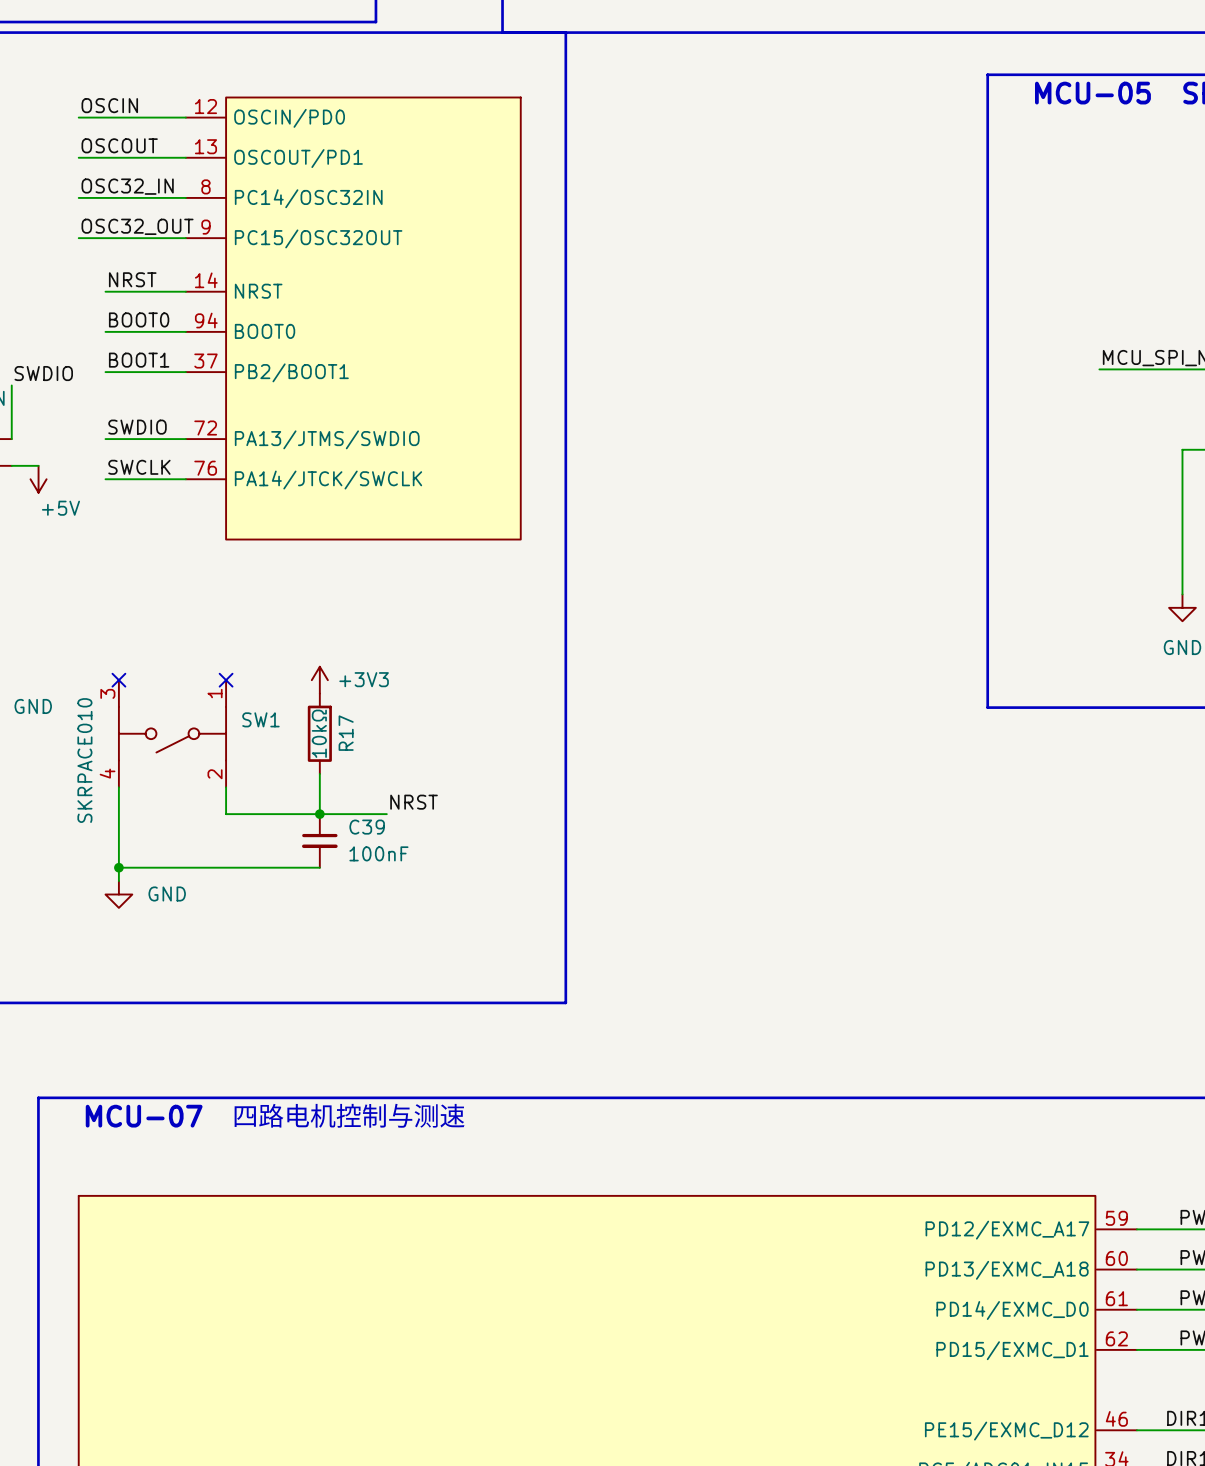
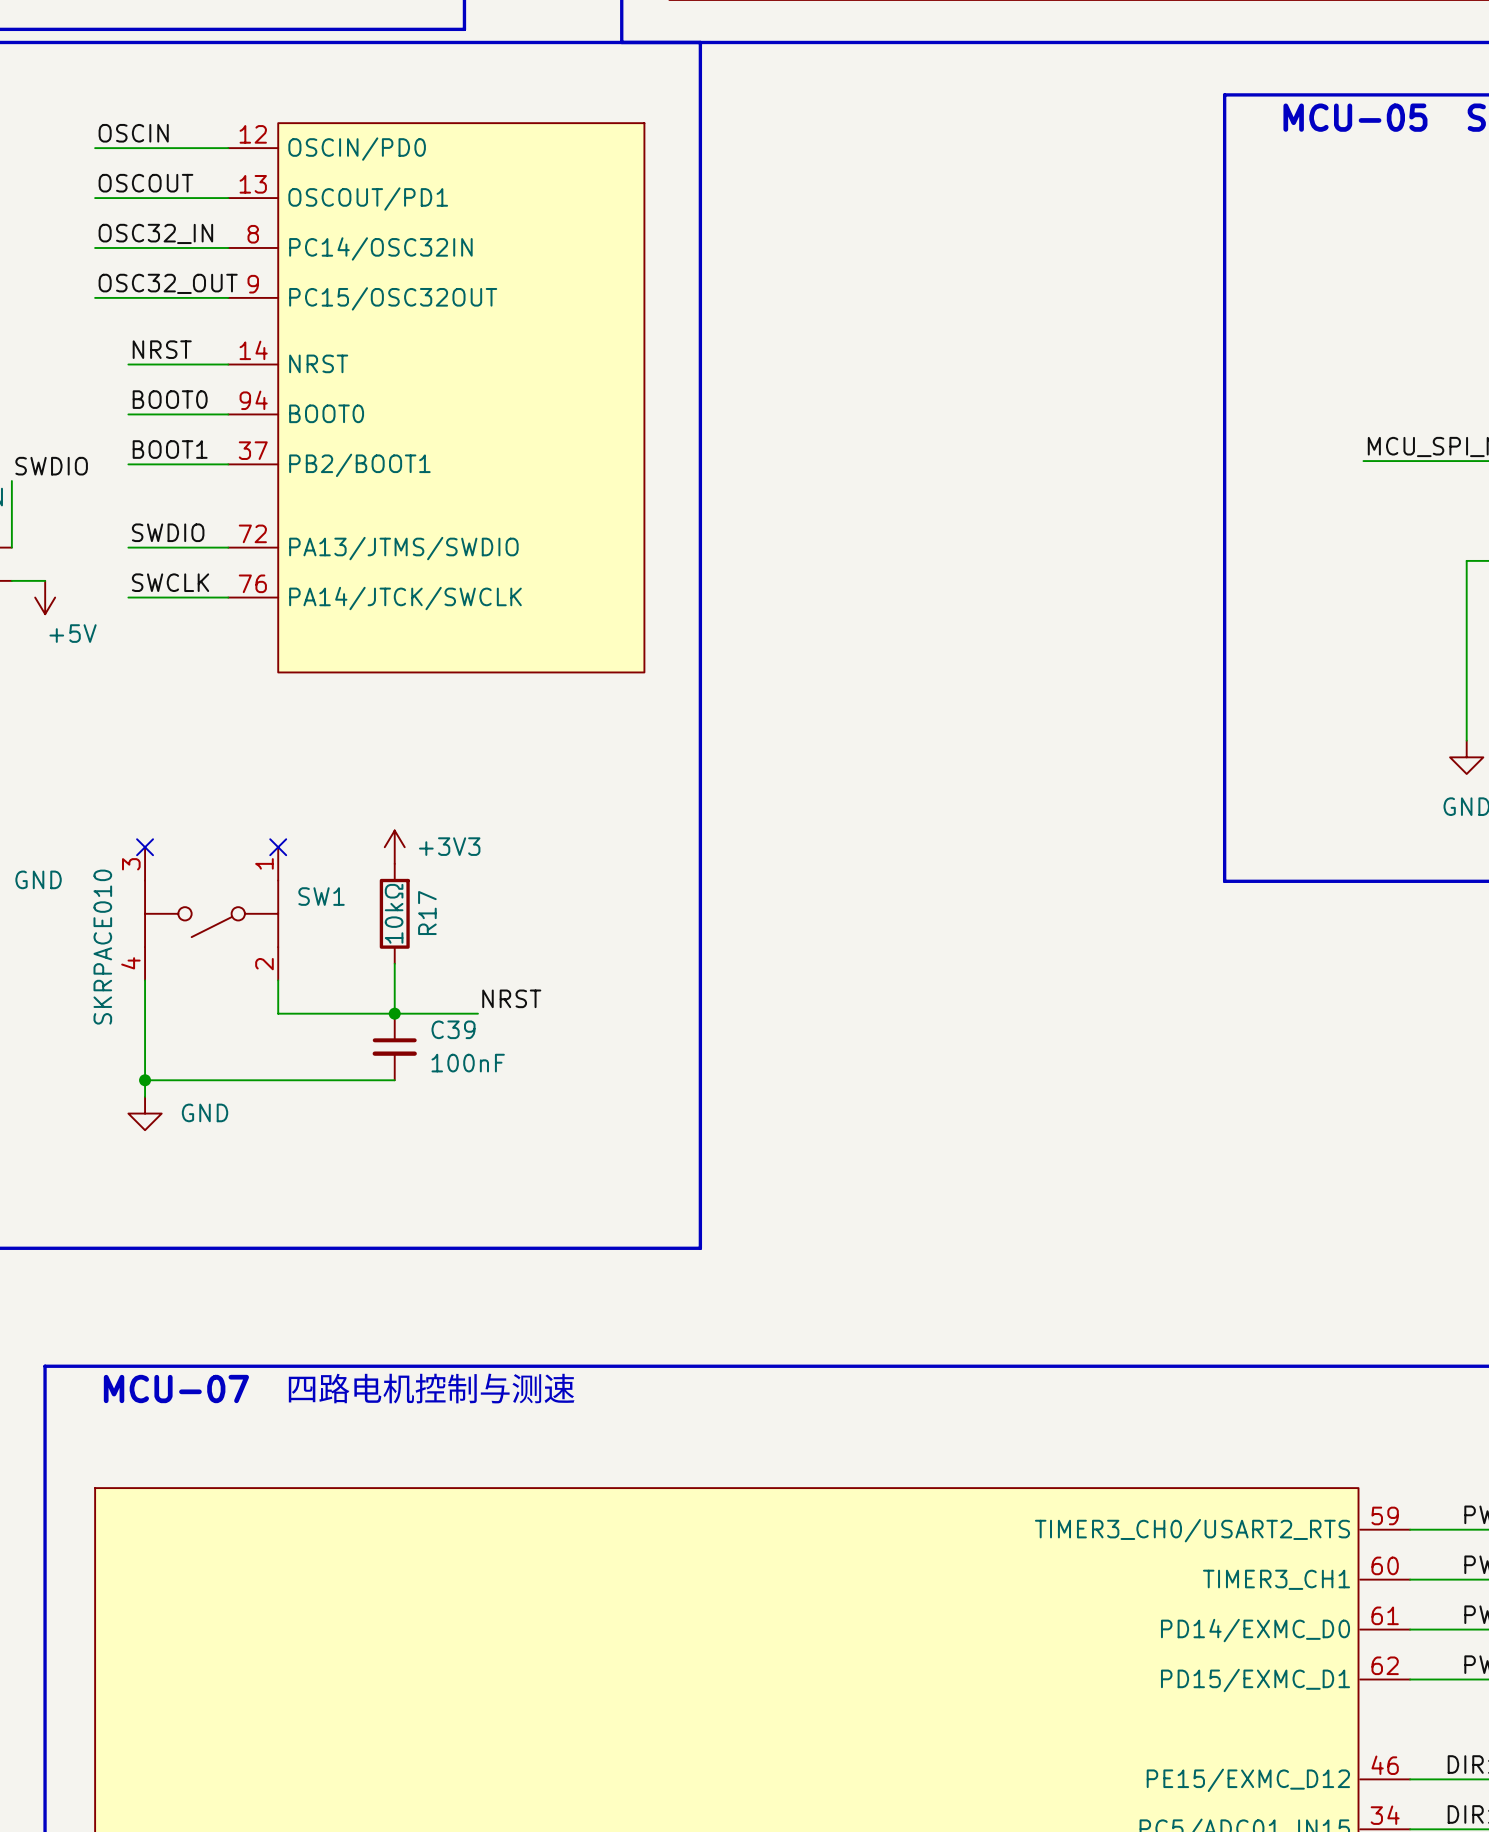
part pin name: PD12/EXMC_A17 (1007, 1230) -> TIMER3_CH0/USART2_RTS (1192, 1530)
part pin name: PD13/EXMC_A18 (1007, 1270) -> TIMER3_CH1 (1276, 1579)

